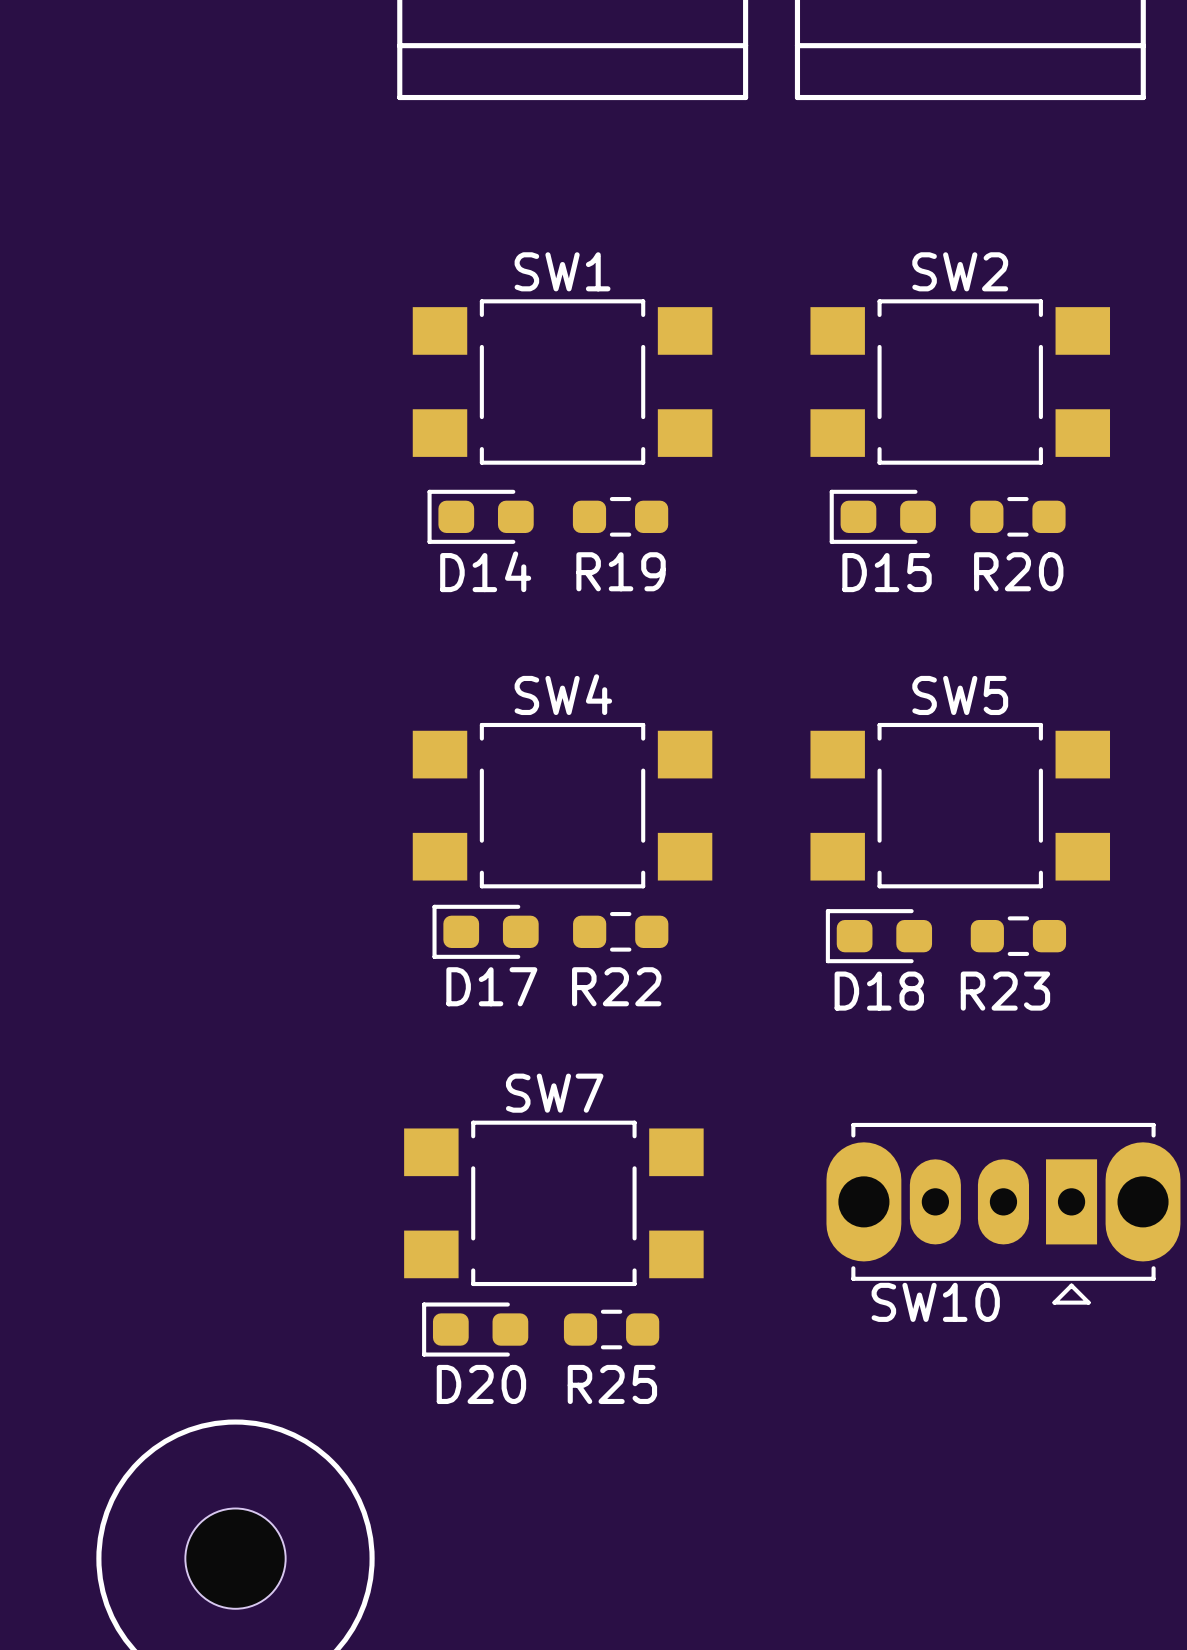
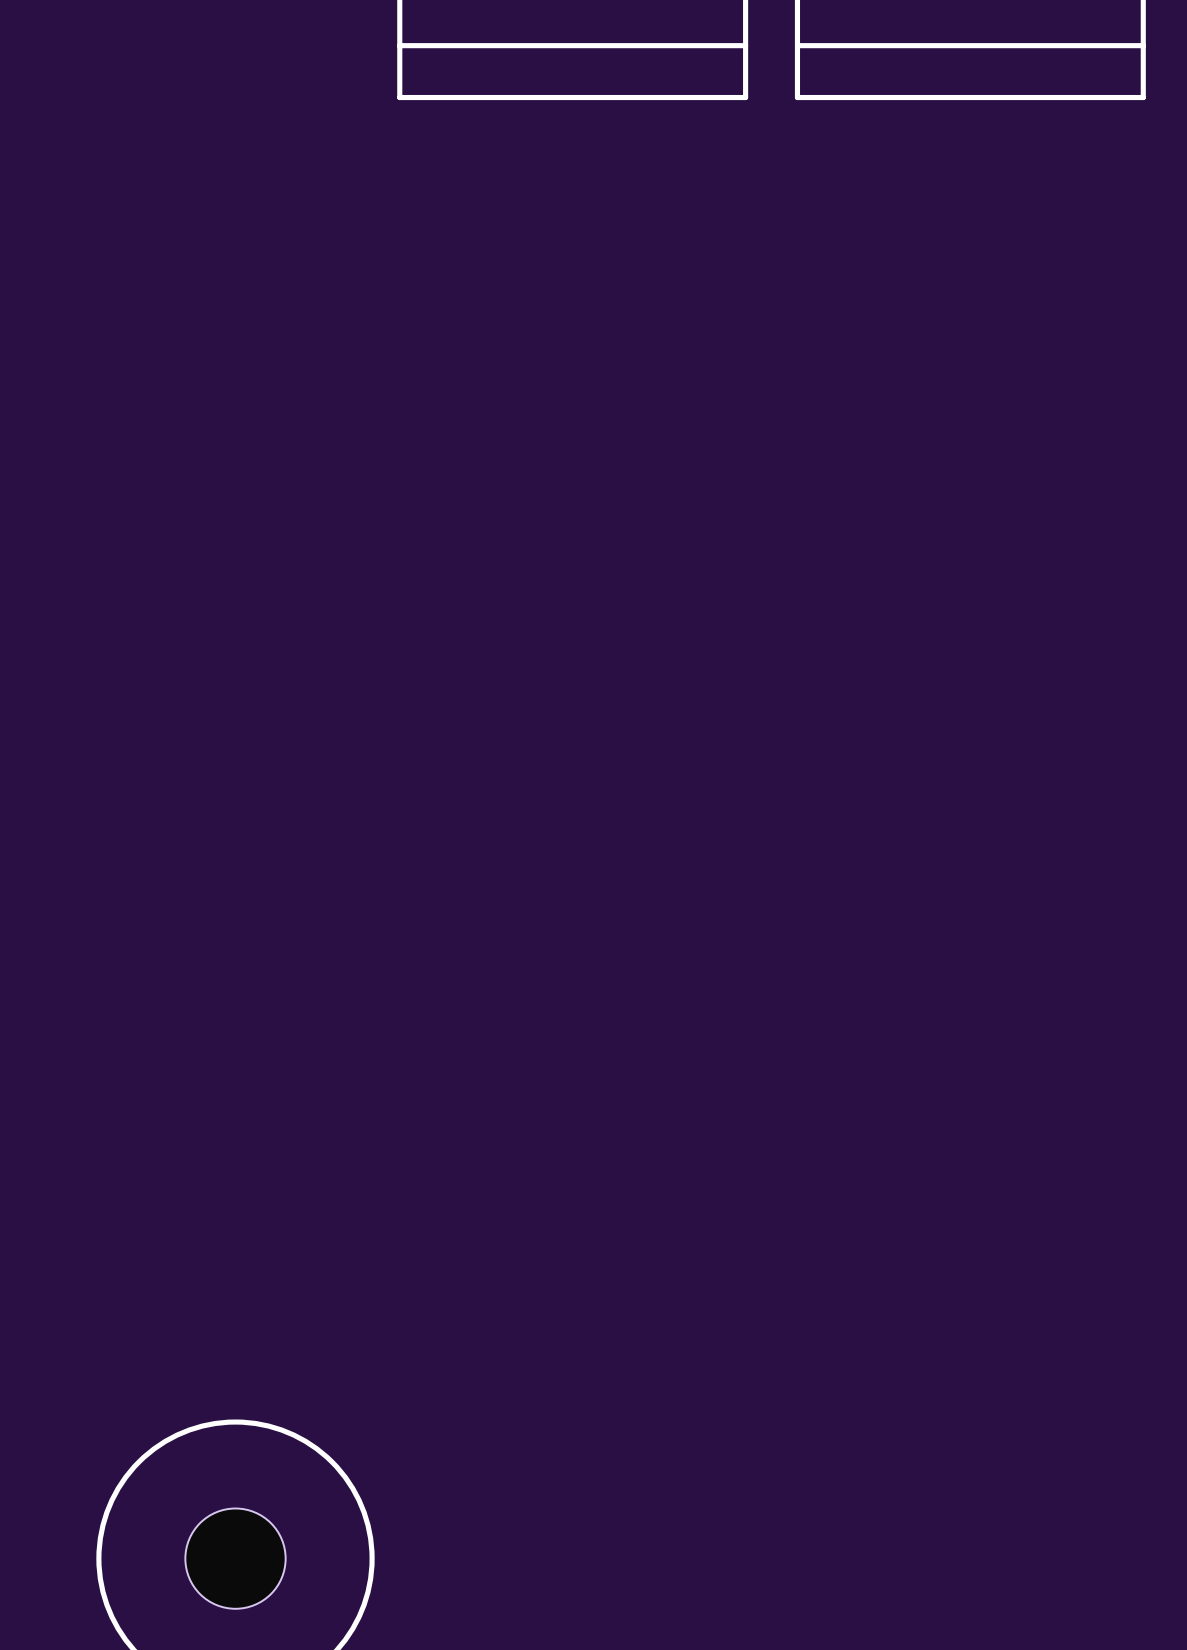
SW1: (562, 382) -> none
SW2: (960, 382) -> none
D14: (480, 516) -> none
R19: (620, 516) -> none
D15: (882, 516) -> none
R20: (1017, 516) -> none
SW4: (562, 805) -> none
SW5: (960, 805) -> none
D17: (485, 931) -> none
R22: (620, 931) -> none
D18: (878, 936) -> none
R23: (1018, 936) -> none
SW7: (553, 1203) -> none
SW10: (1003, 1213) -> none
D20: (475, 1329) -> none
R25: (611, 1329) -> none

